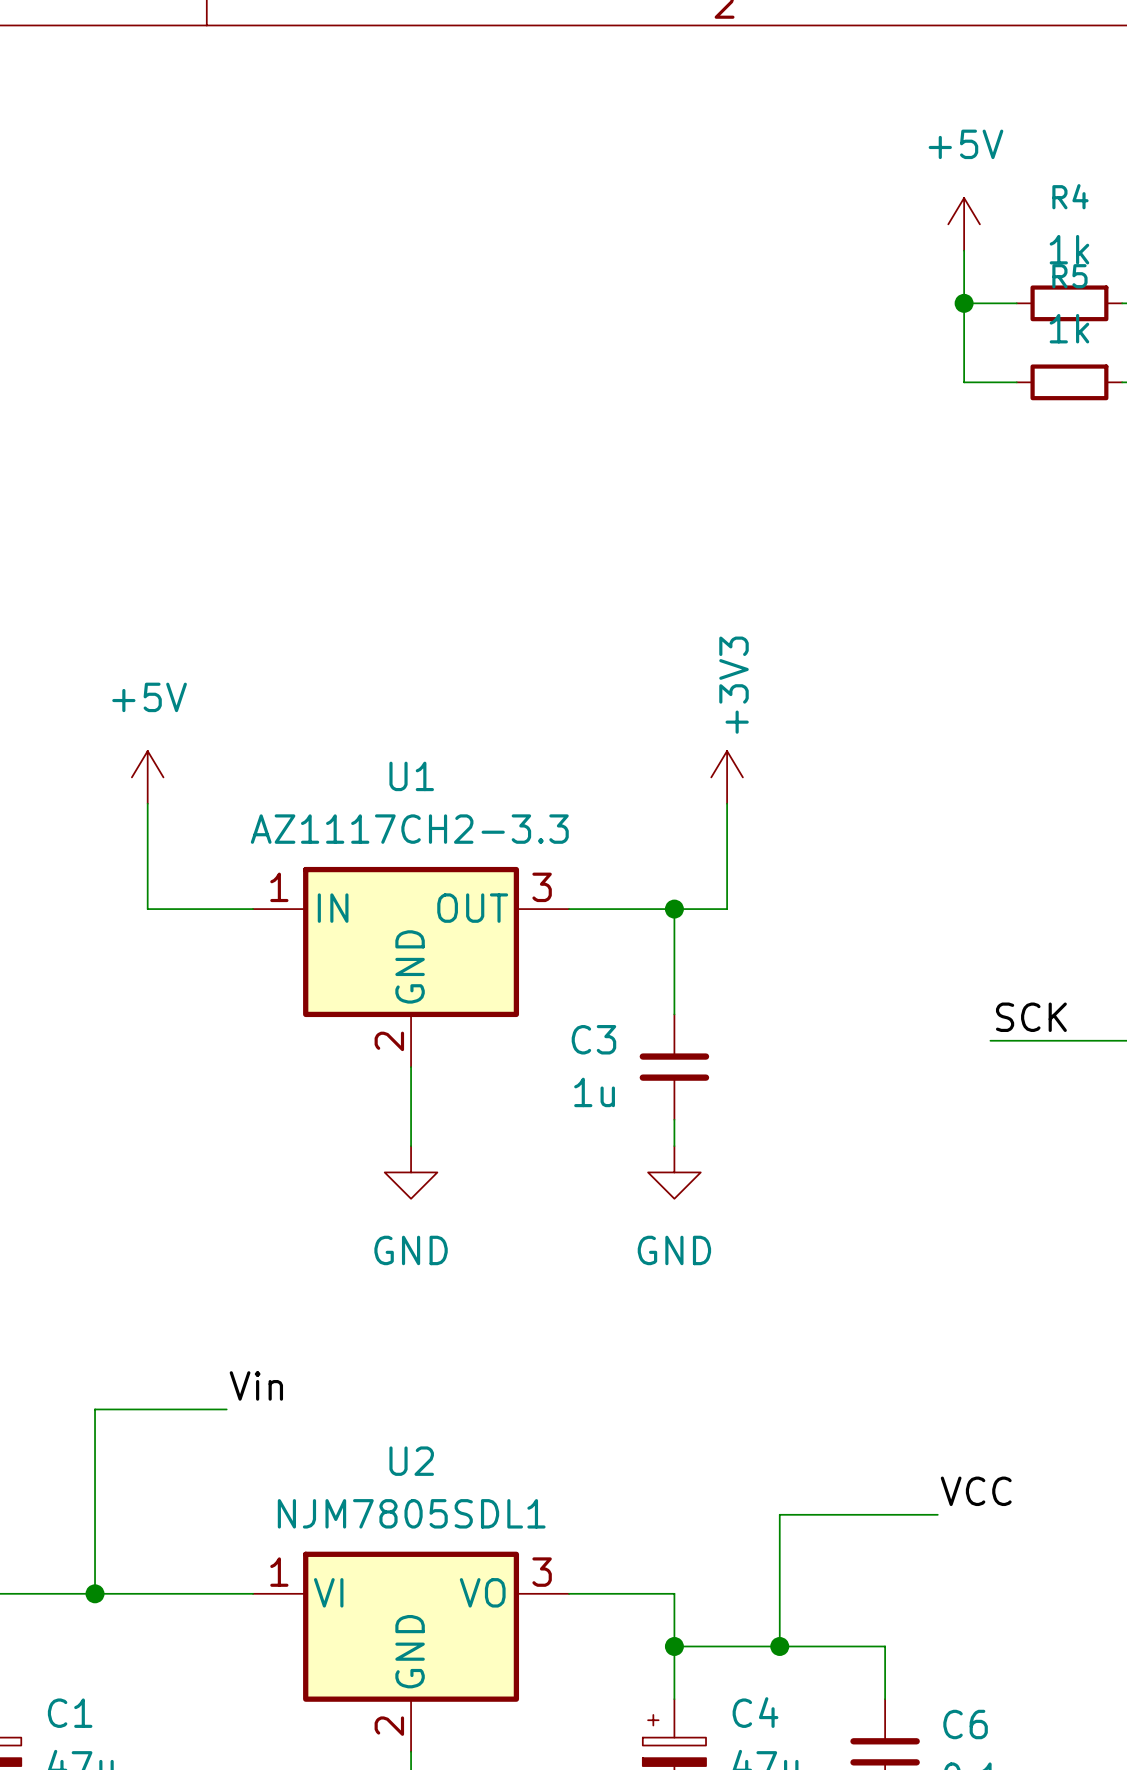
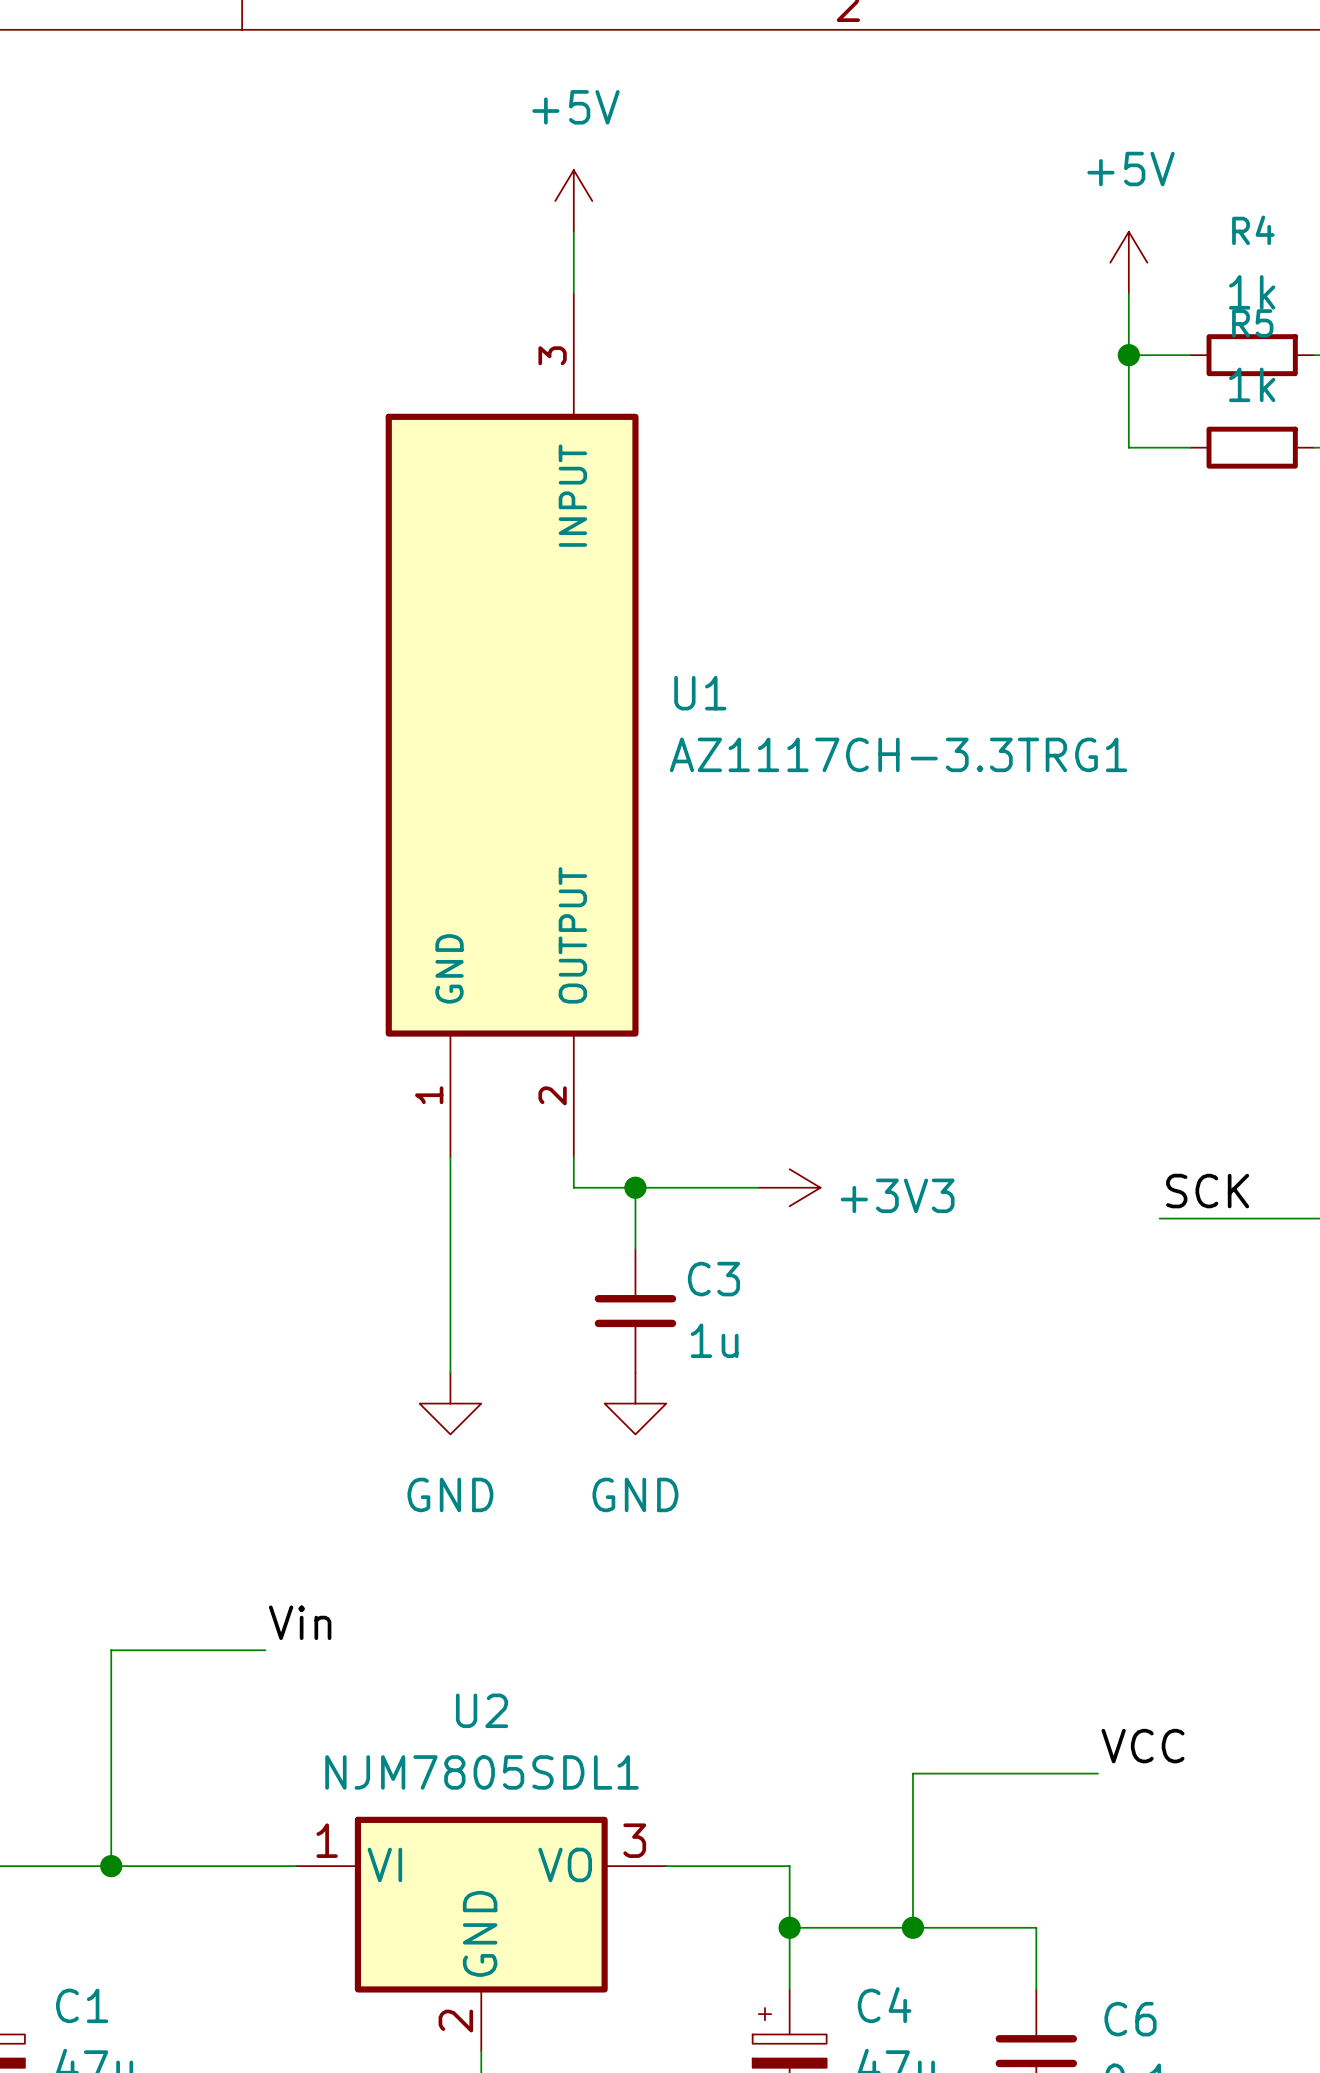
power symbol: none -> +5V (573, 200)
wire: none -> (573, 231) (573, 293)
U1 name position: U1 (411, 776) -> U1 (700, 693)
power symbol: +5V (147, 777) -> none
power symbol rotation: 0° (727, 777) -> 90° clockwise (789, 1187)
power symbol position: +3V3 (727, 777) -> +3V3 (789, 1187)
wire: (147, 803) (147, 909) (253, 909) -> none
wire: (727, 803) (727, 909) (569, 909) -> none
U1 value: AZ1117CH2-3.3 (409, 829) -> AZ1117CH-3.3TRG1 (898, 754)
U1 symbol: [253, 866, 570, 1068] -> [385, 293, 639, 1157]
wire: (674, 909) (674, 1014) -> none
junction: (674, 909) -> none
wire: none -> (450, 1156) (450, 1372)
wire: none -> (573, 1156) (573, 1187) (758, 1187)
wire: none -> (635, 1187) (635, 1249)
junction: none -> (635, 1187)
C3 name position: C3 (593, 1039) -> C3 (713, 1279)
wire: (411, 1067) (411, 1146) -> none
C3 position: (674, 1067) -> (635, 1311)
C3 value position: 1u (594, 1092) -> 1u (714, 1340)
wire: (674, 1119) (674, 1146) -> none
power symbol position: GND (411, 1172) -> GND (450, 1403)
power symbol: GND (674, 1172) -> none
power symbol: none -> GND (635, 1403)

